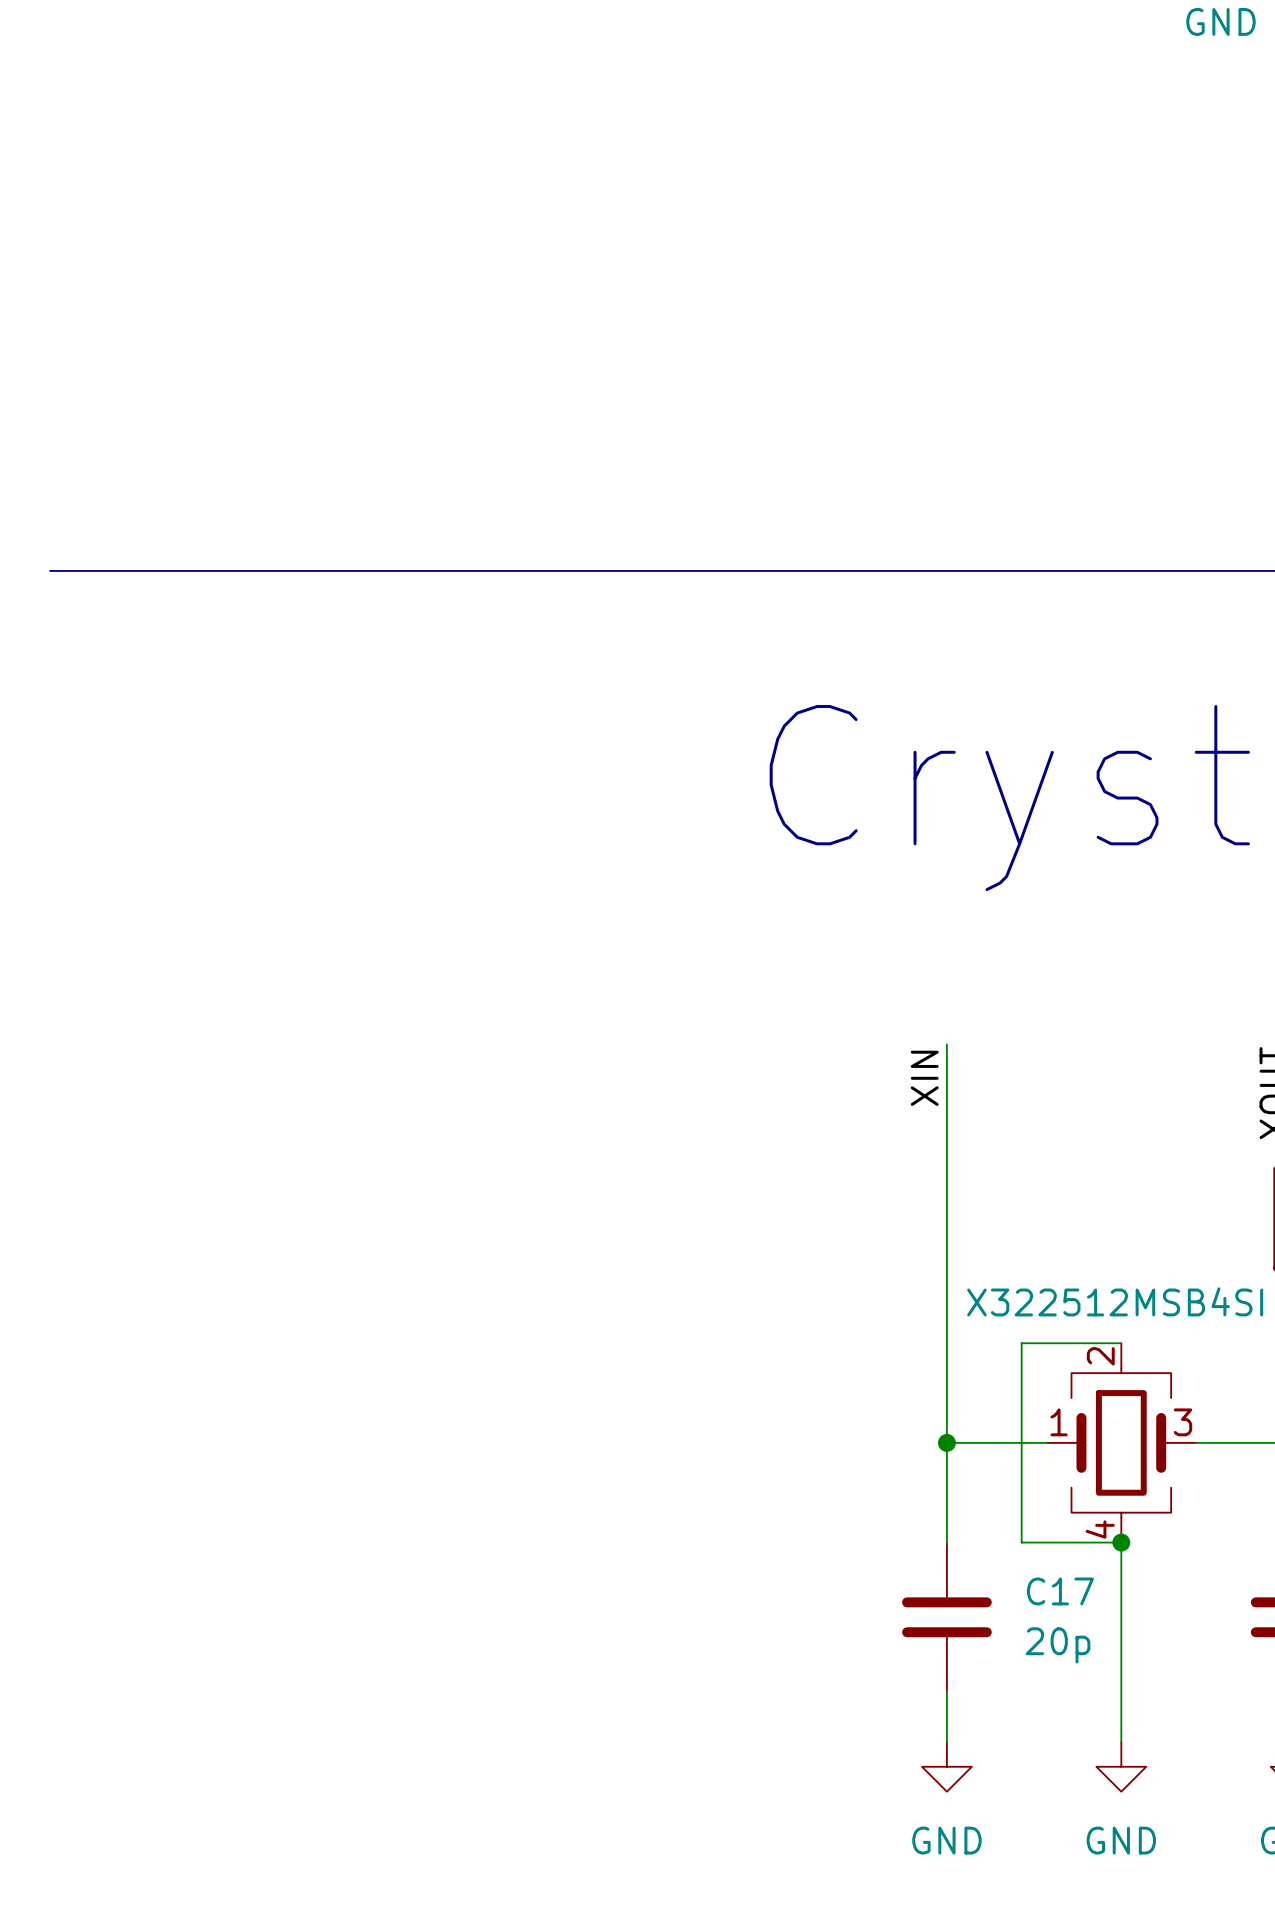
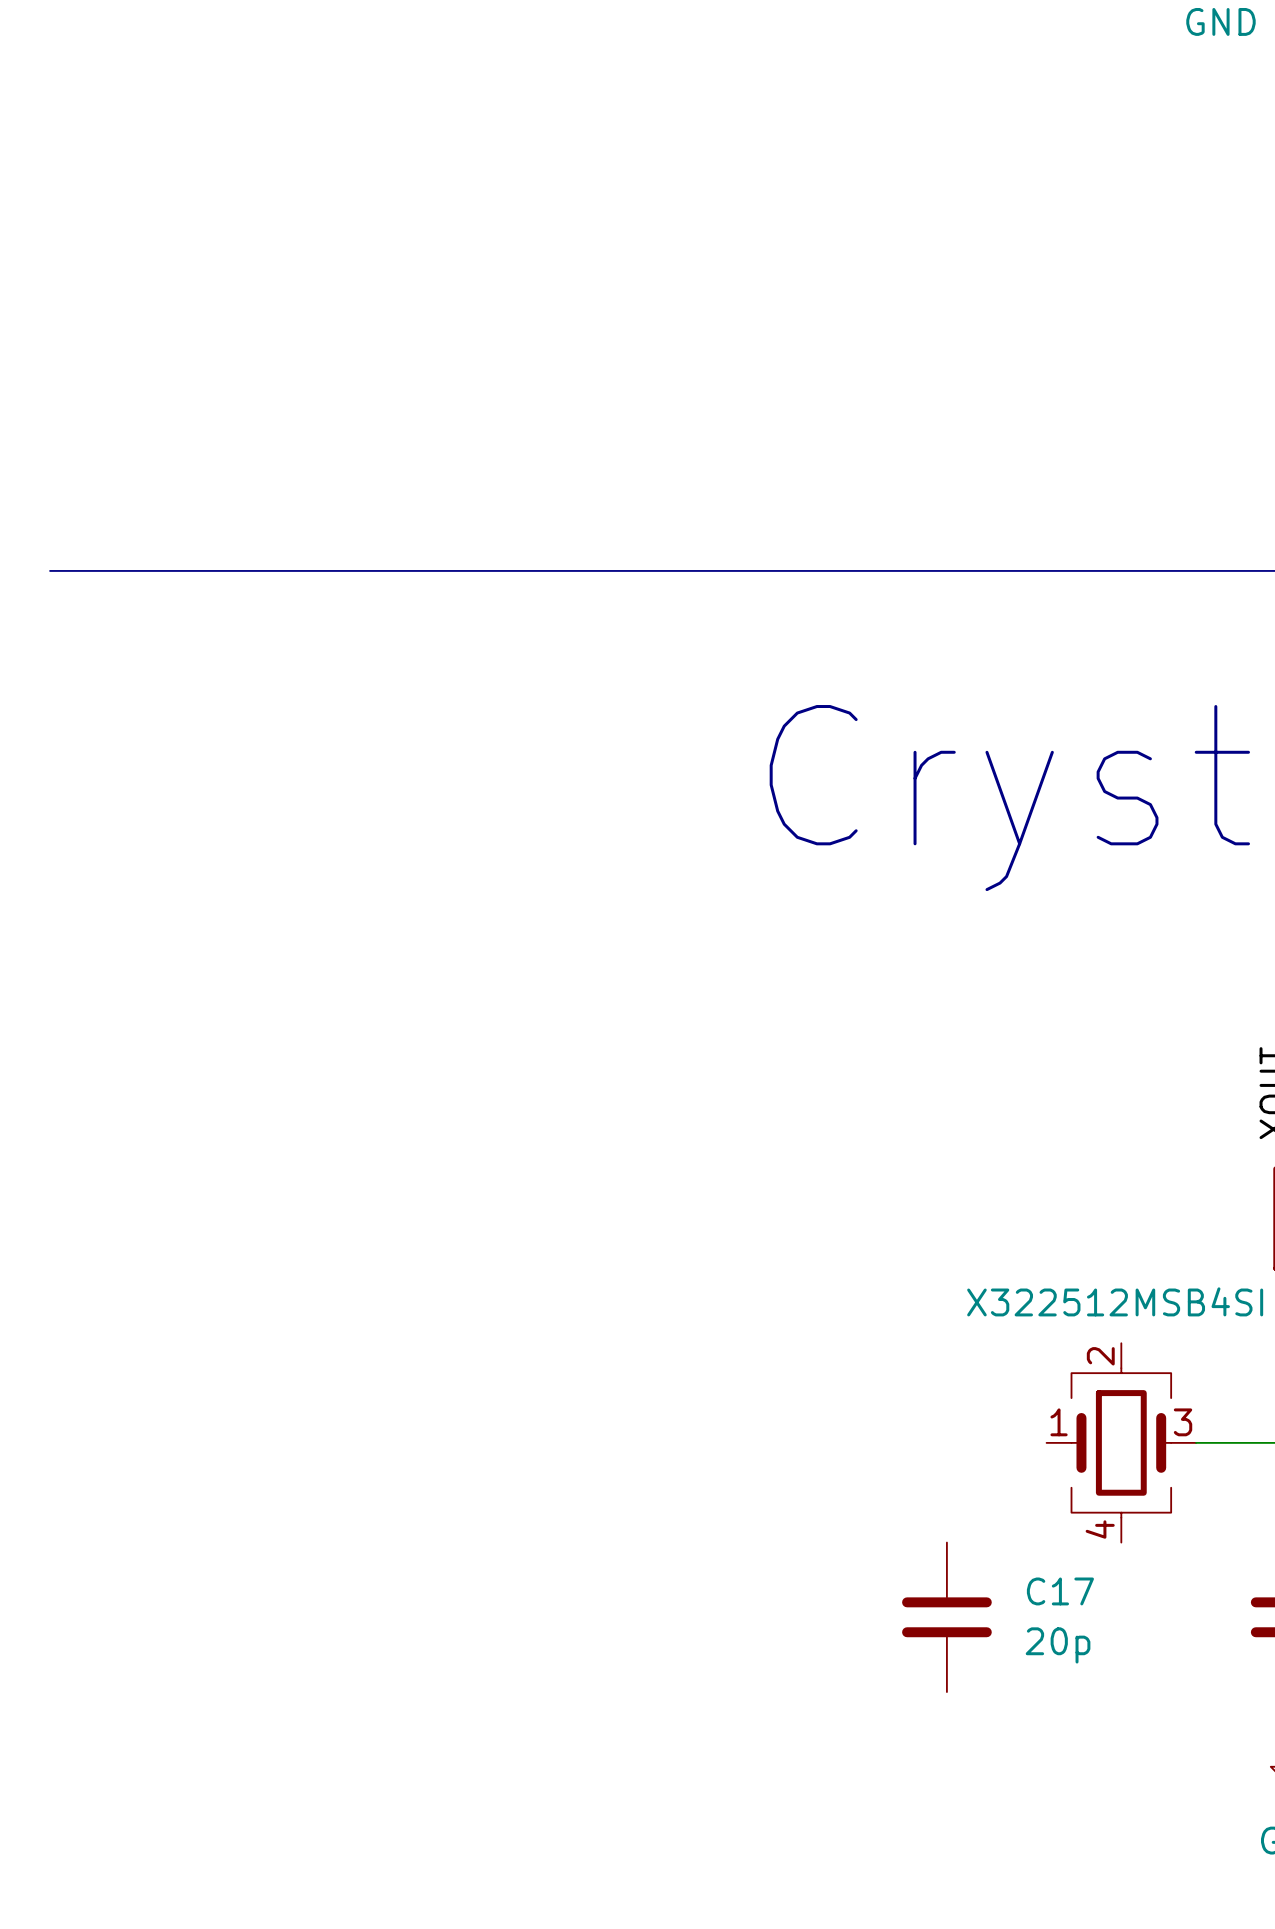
wire: (946, 1044) (946, 1542) -> none
label: XIN (924, 1078) -> none
wire: (1121, 1343) (1021, 1343) (1021, 1542) (1121, 1542) (1121, 1741) -> none
wire: (946, 1442) (1046, 1442) -> none
junction: (946, 1442) -> none
junction: (1121, 1542) -> none
wire: (946, 1692) (946, 1741) -> none
power symbol: GND (946, 1766) -> none
power symbol: GND (1121, 1766) -> none

